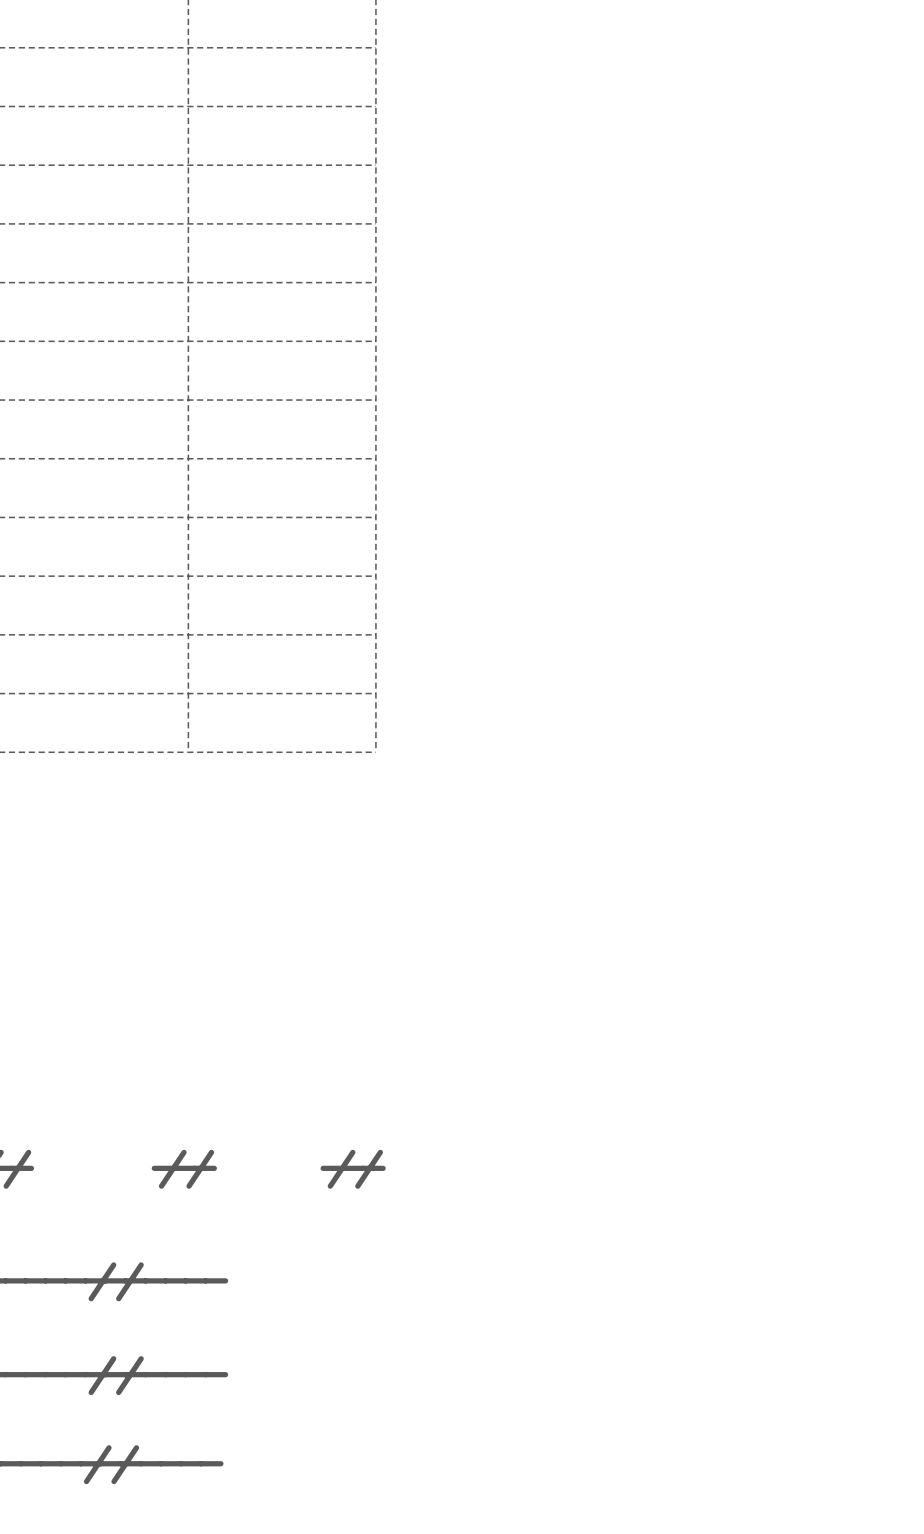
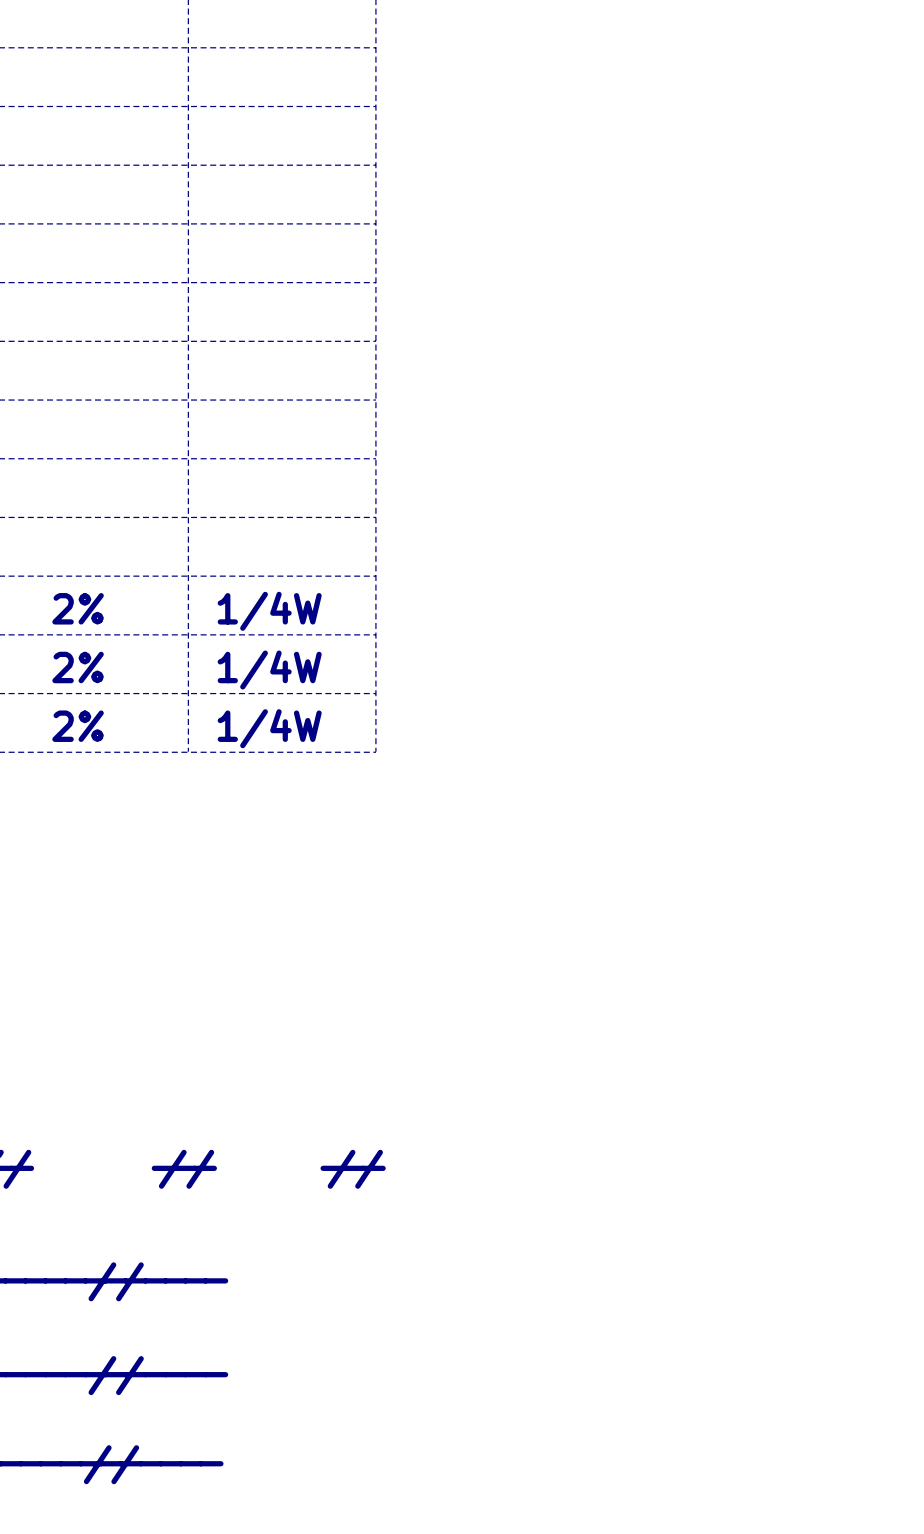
text: none -> 2% (78, 608)
text: none -> 1/4W (269, 611)
text: none -> 2% (78, 667)
text: none -> 1/4W (269, 670)
text: none -> 2% (78, 726)
text: none -> 1/4W (269, 728)

